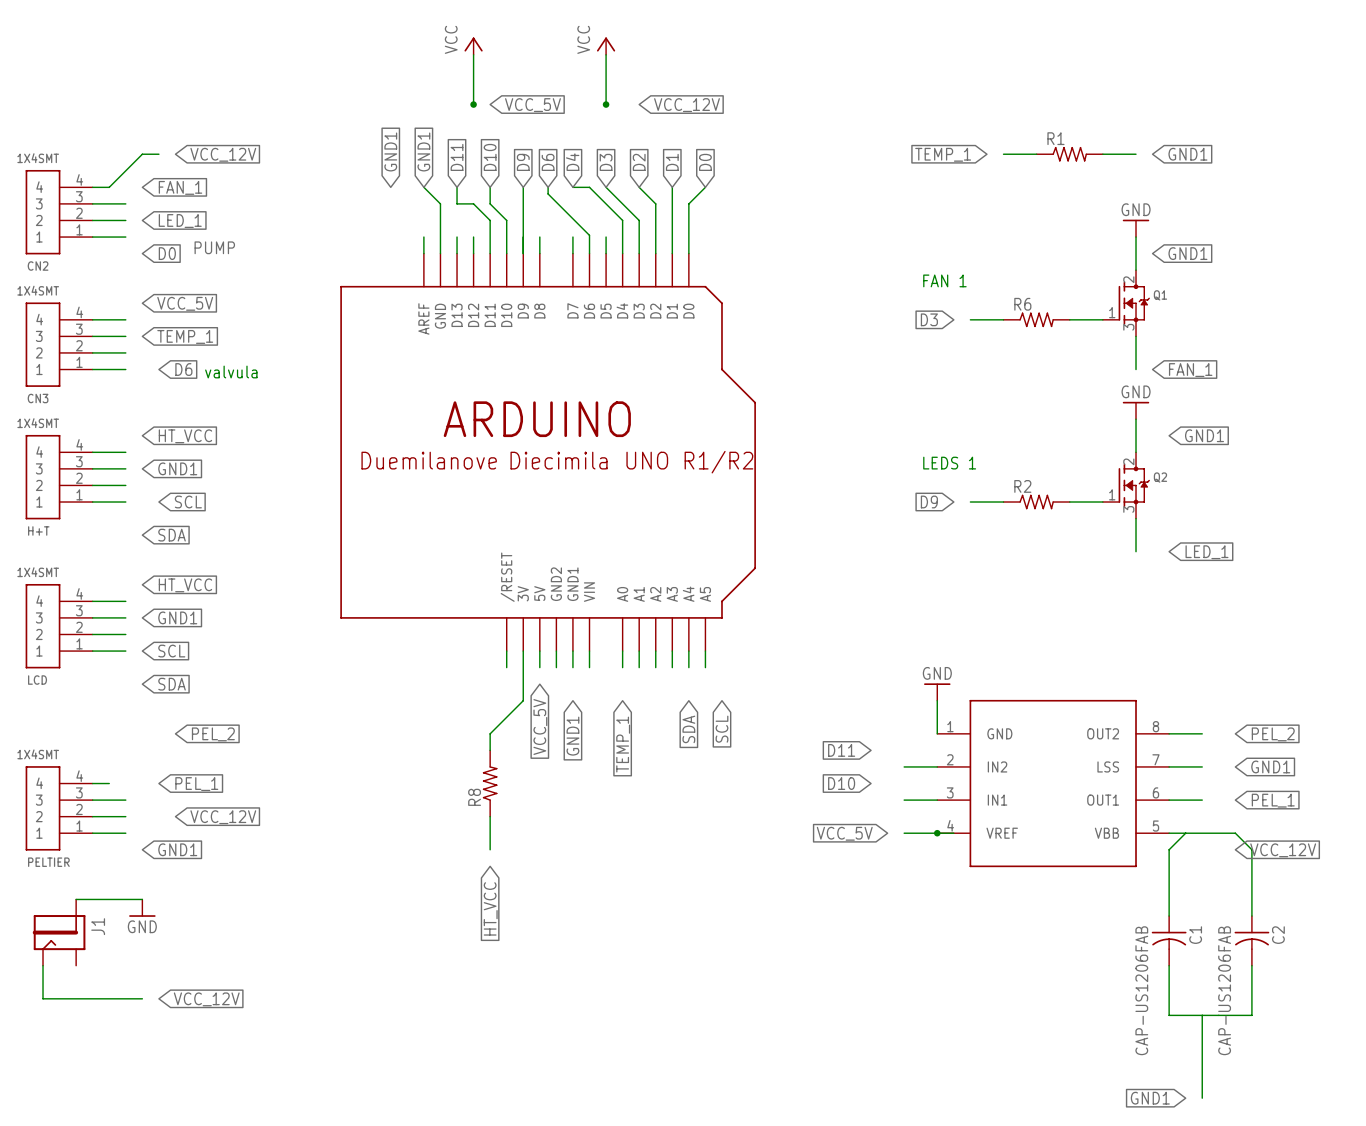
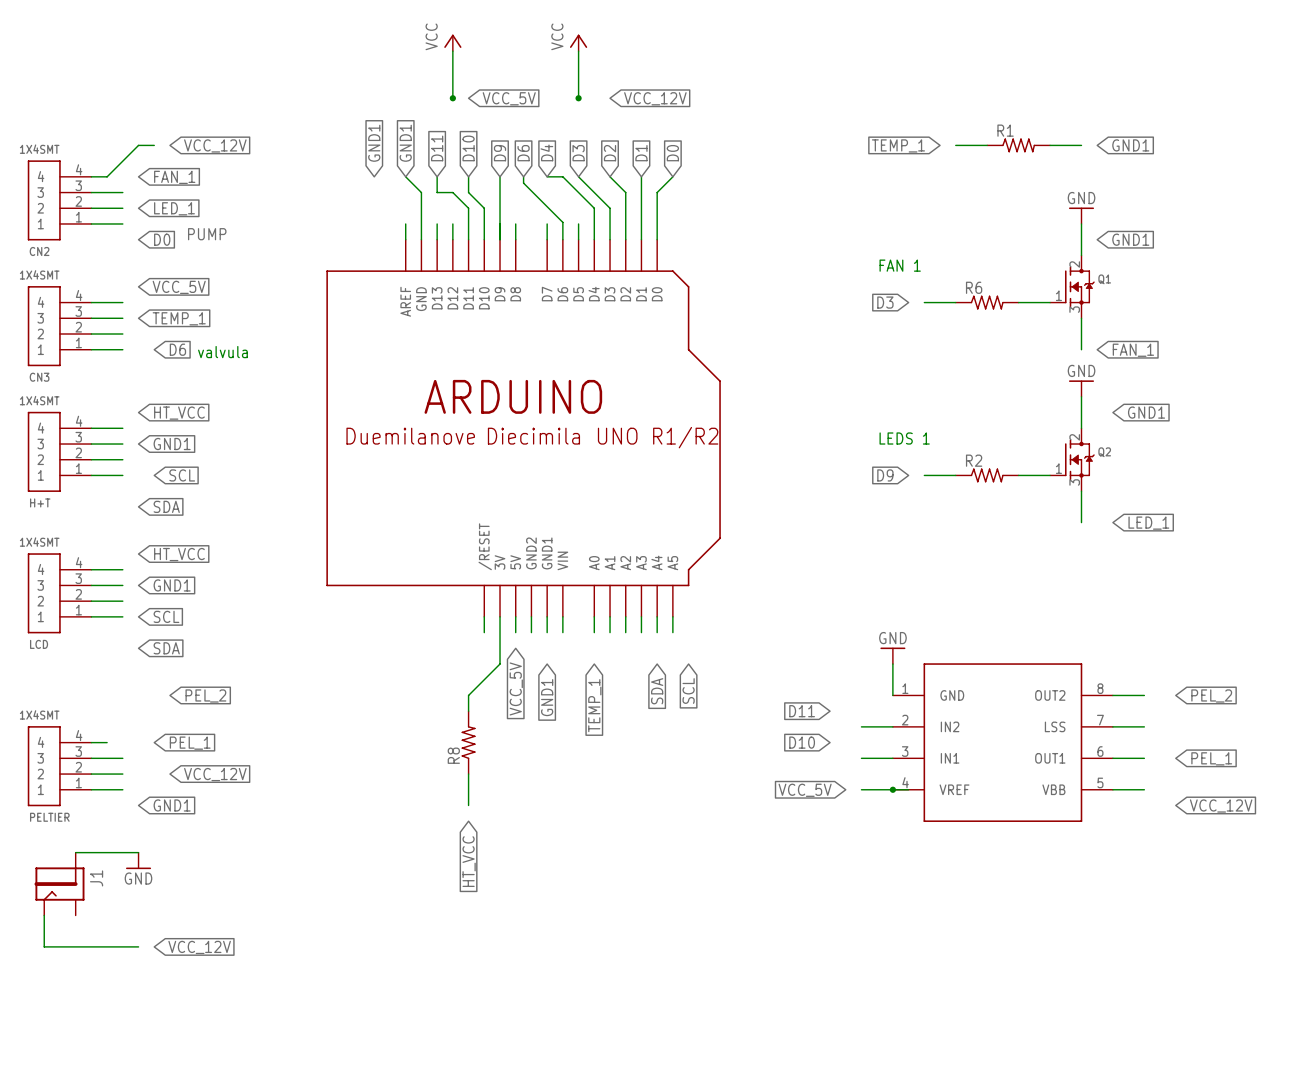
global label: GND1 (1270, 766) -> none
wire: (1185, 833) (1169, 849) (1169, 916) -> none
wire: (1202, 833) (1235, 833) (1251, 849) (1251, 916) -> none
C1: CAP-US1206FAB (1169, 940) -> none
C2: CAP-US1206FAB (1251, 940) -> none
wire: (1169, 965) (1169, 1015) (1251, 1015) (1251, 965) -> none
wire: (1202, 1015) (1202, 1098) -> none
global label: GND1 (1150, 1098) -> none

